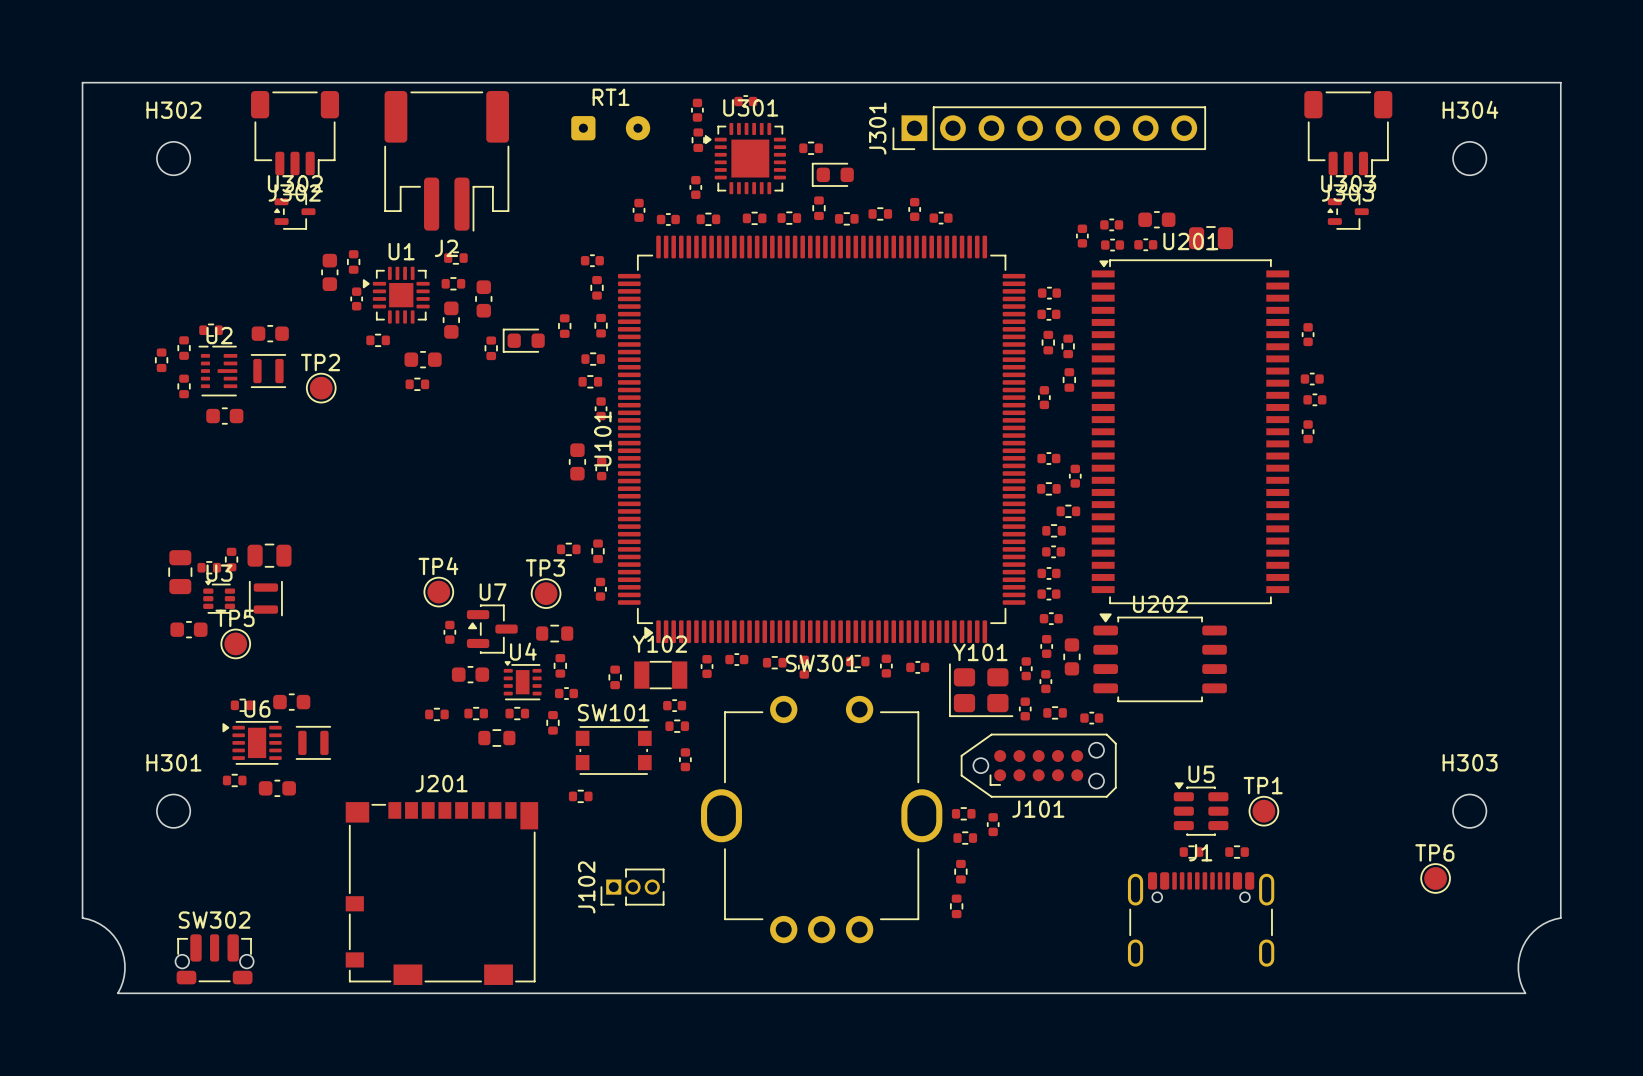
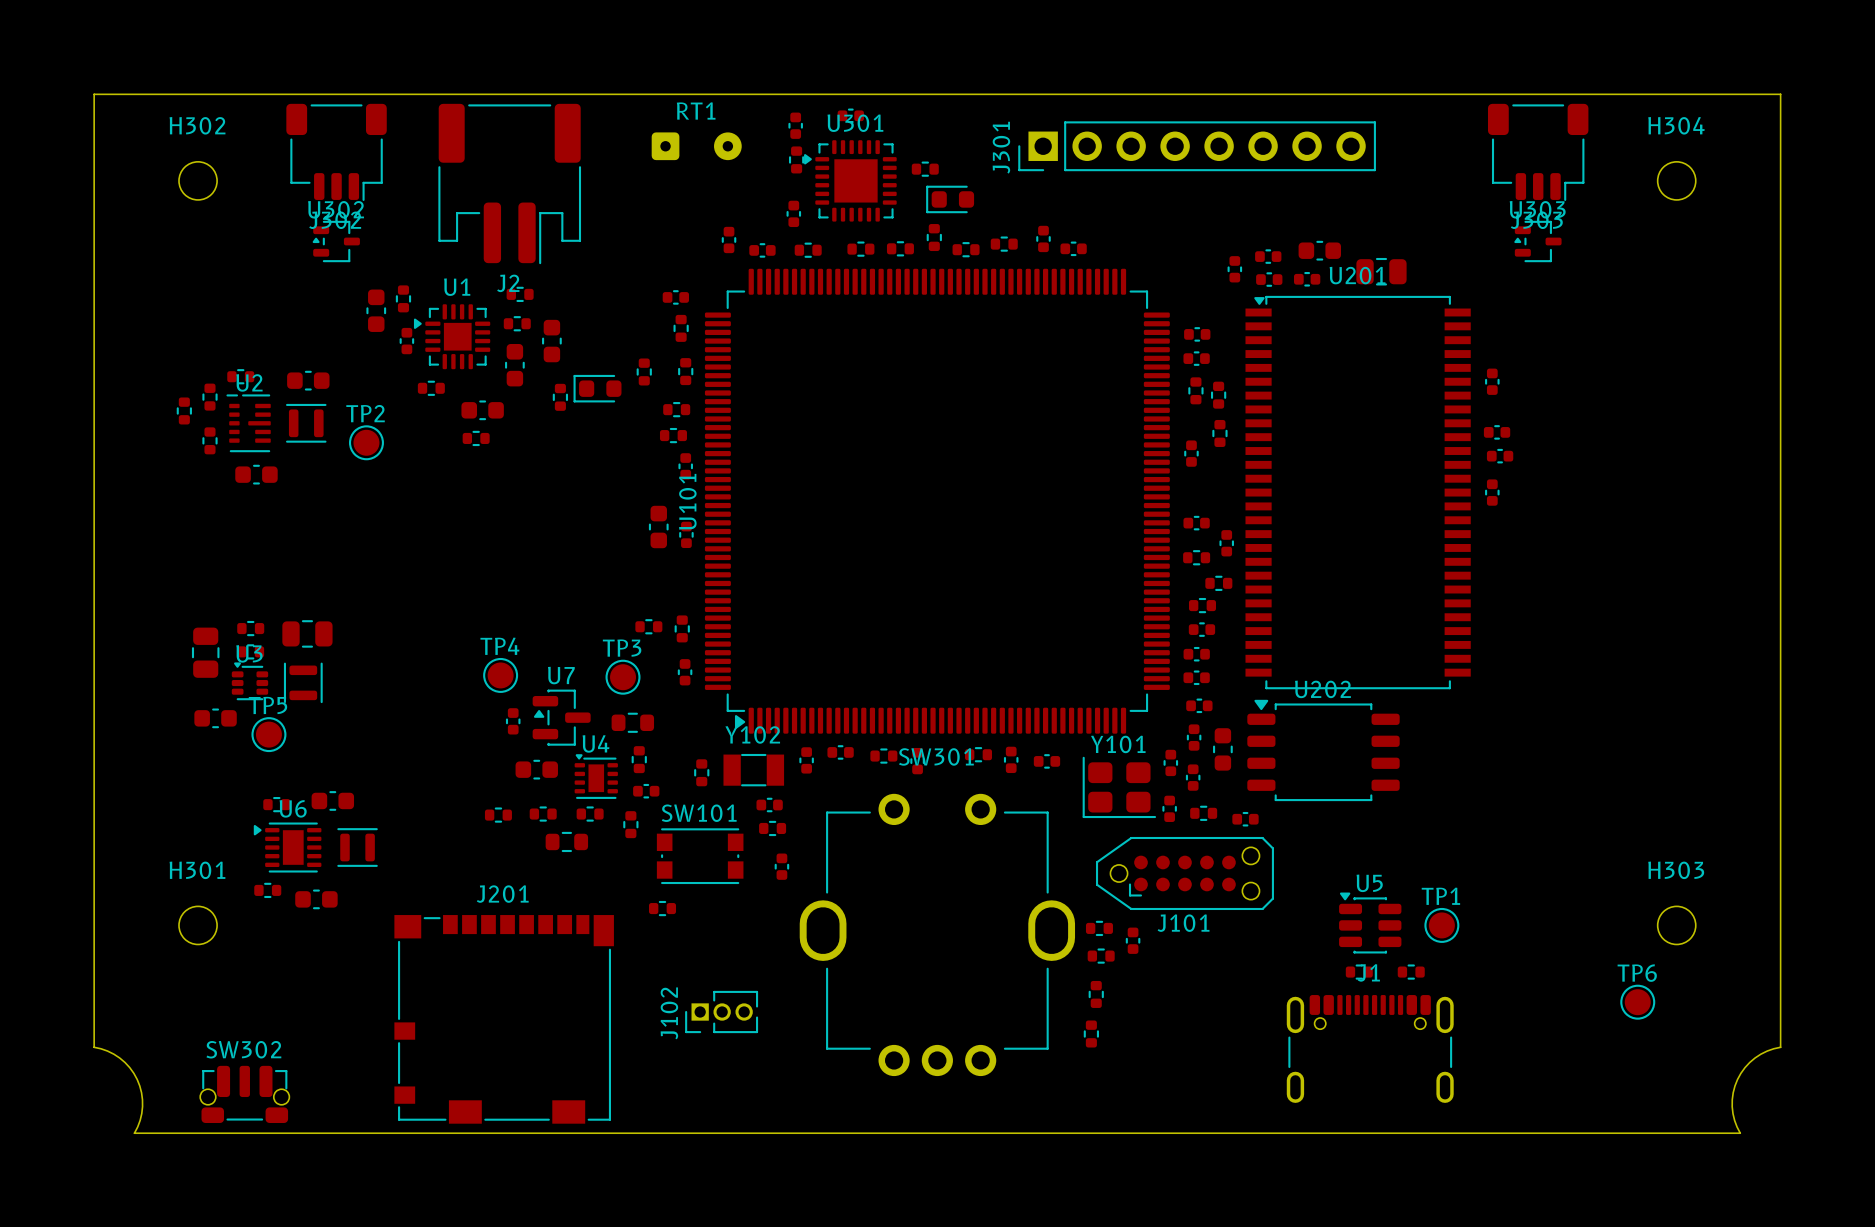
part: none -> (250, 628)
part: (231, 559) -> none
part: (209, 567) -> none
part: none -> (250, 651)

